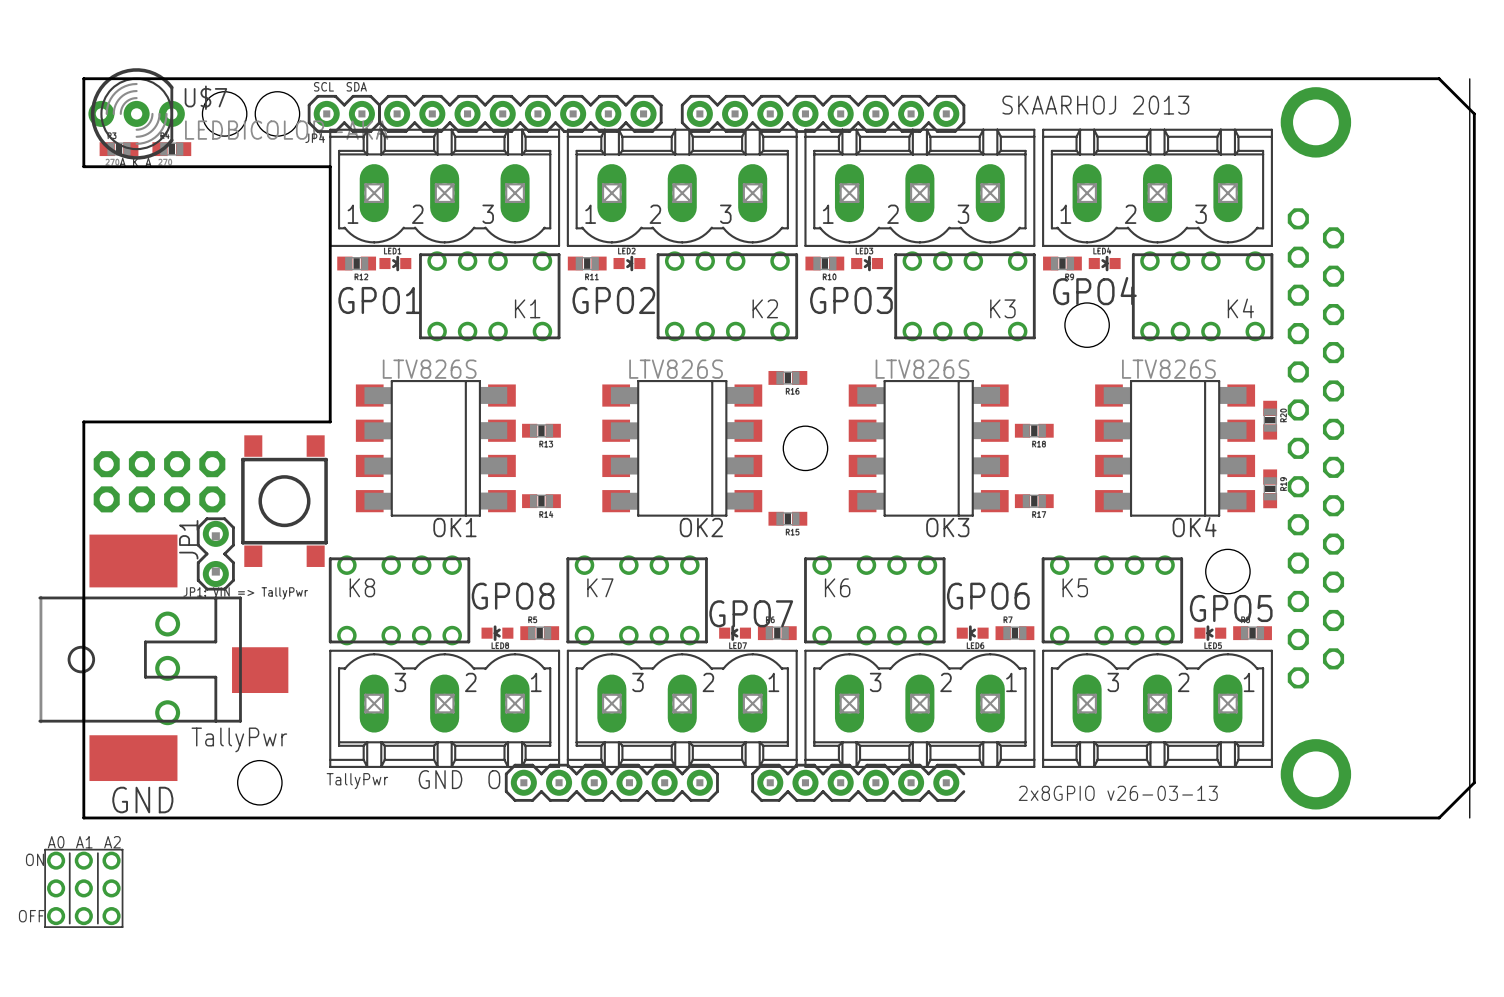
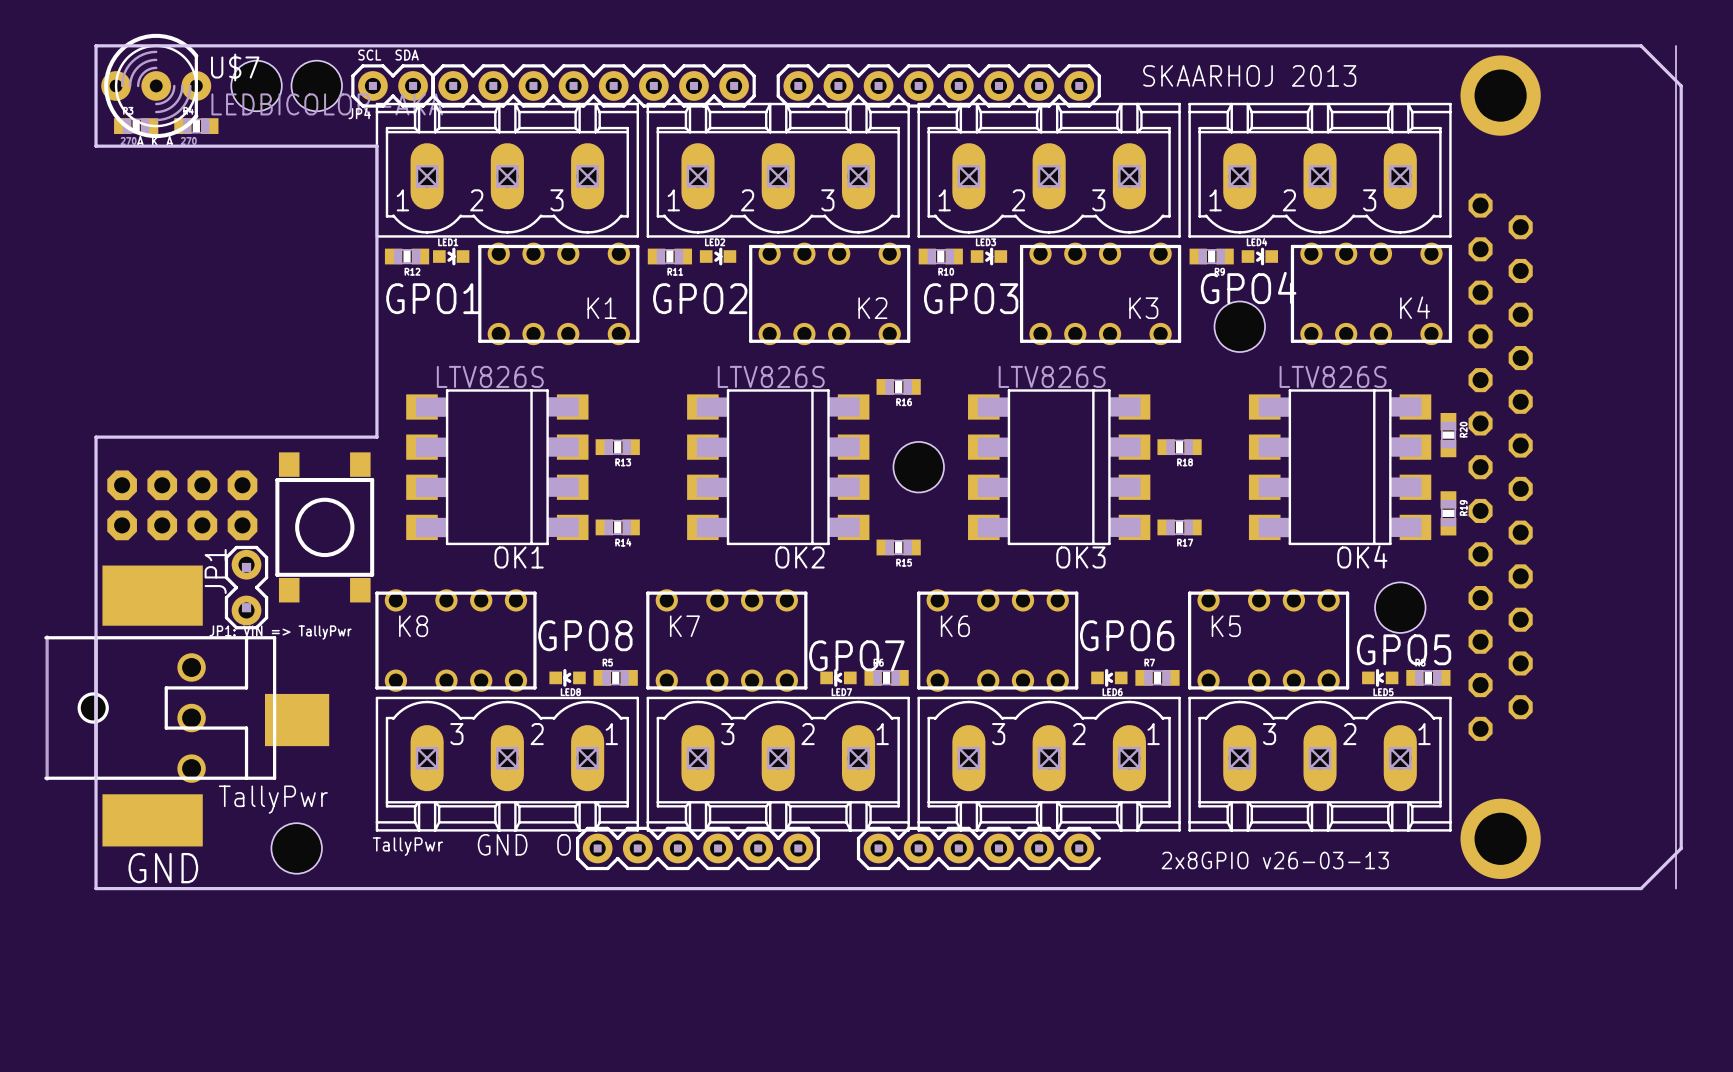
part: (83, 888) -> none

